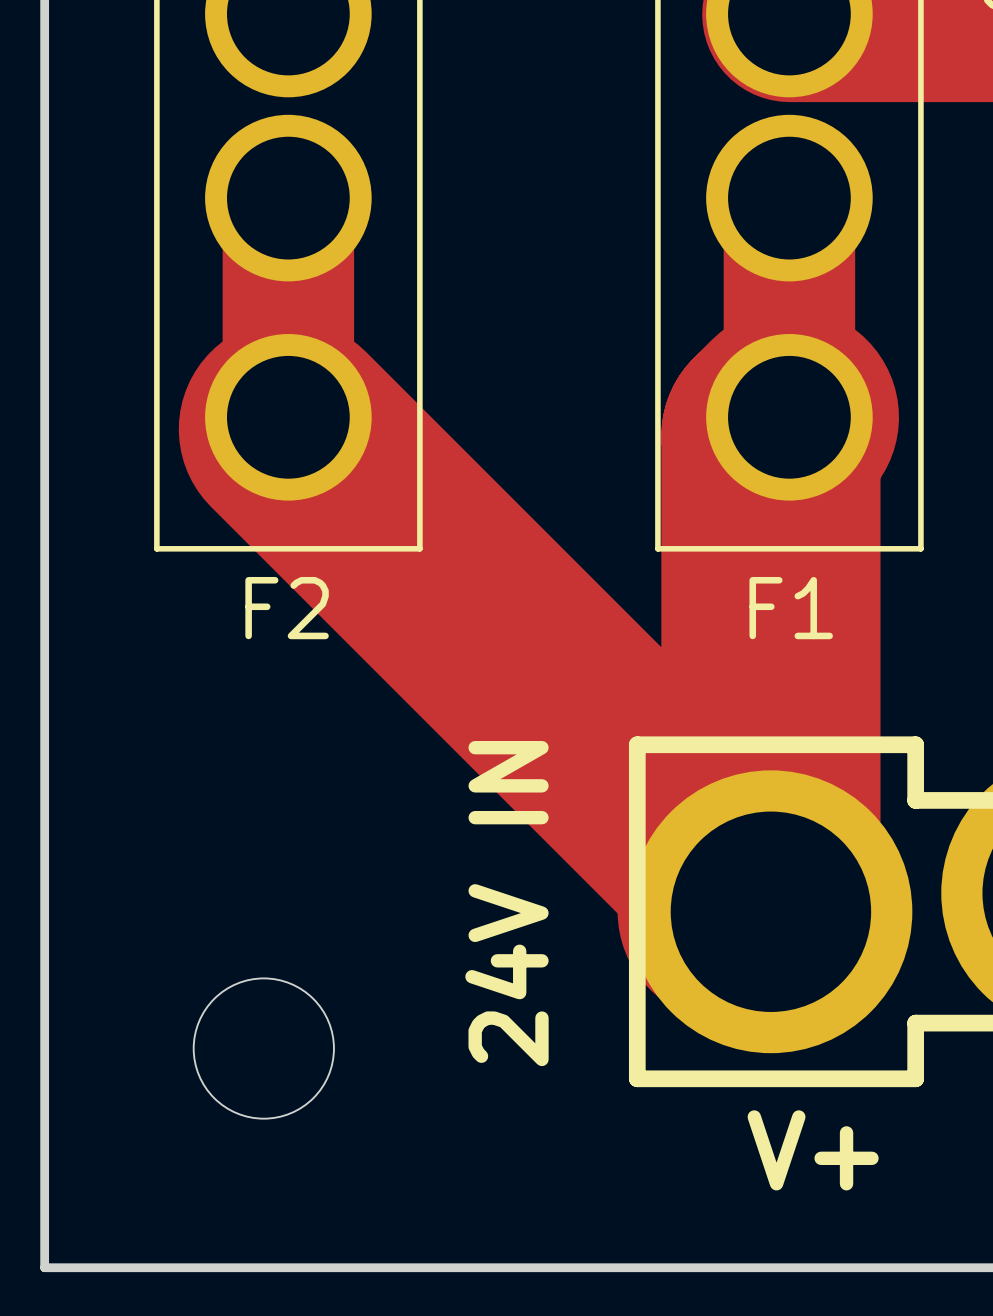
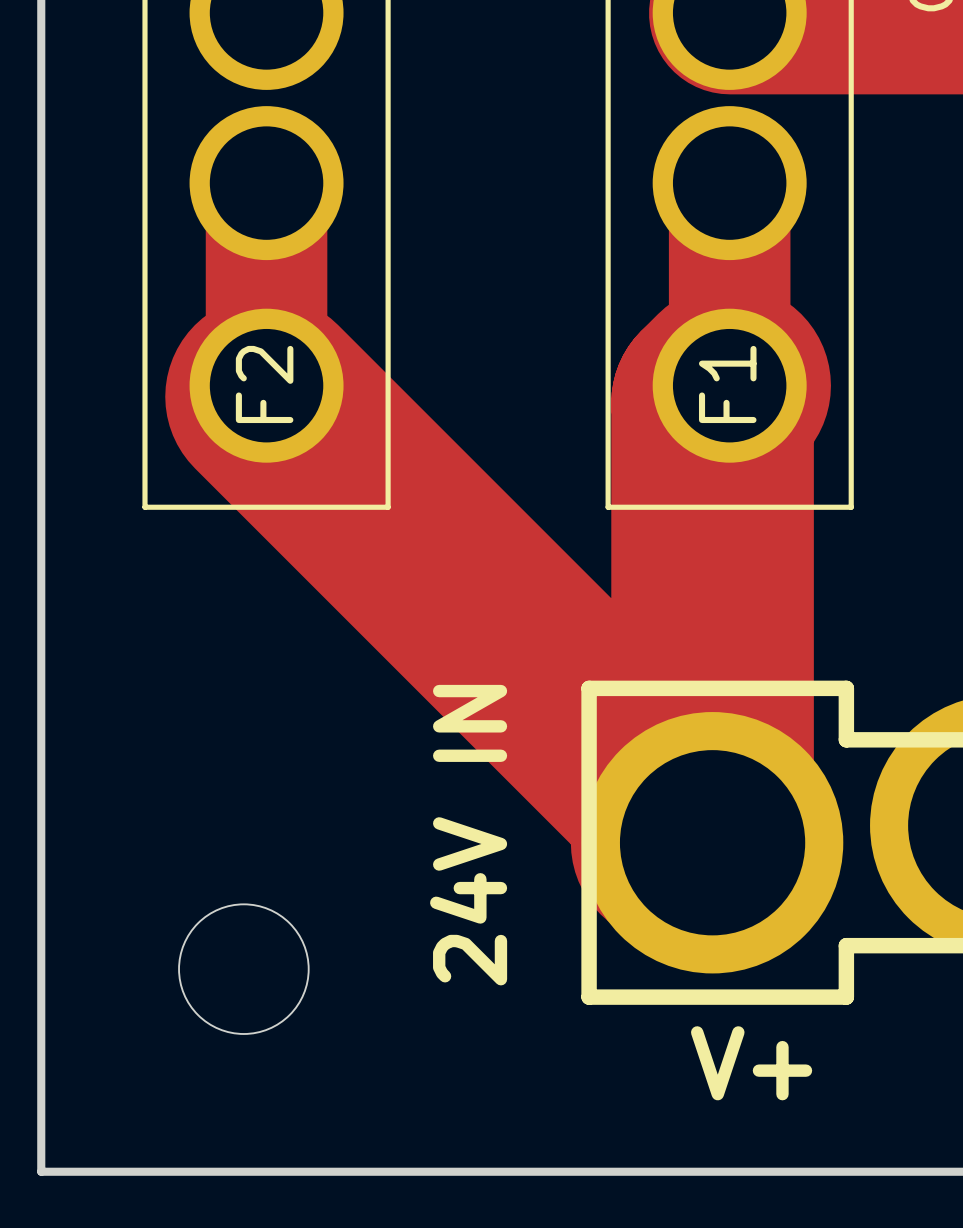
F2 name rotation: 0° (287, 608) -> 90° counterclockwise (264, 384)
F2 name position: F2 (287, 608) -> F2 (264, 384)
F1 name rotation: 0° (791, 608) -> 90° counterclockwise (727, 384)
F1 name position: F1 (791, 608) -> F1 (727, 384)

